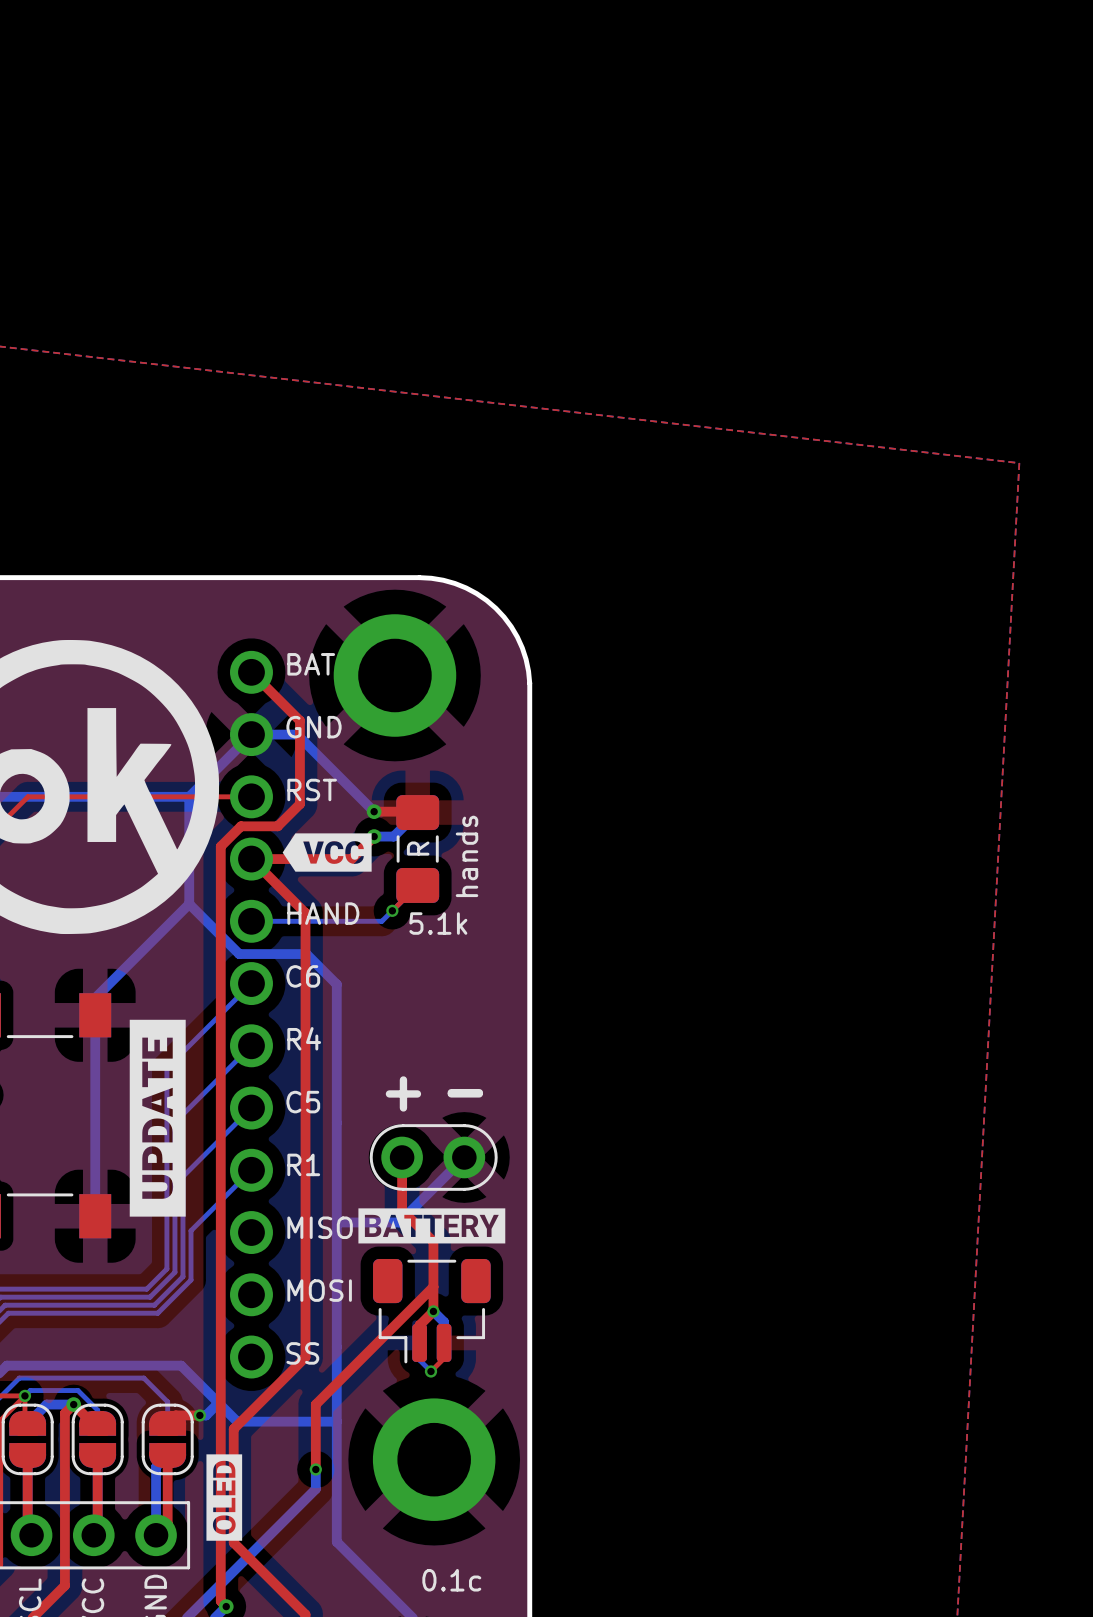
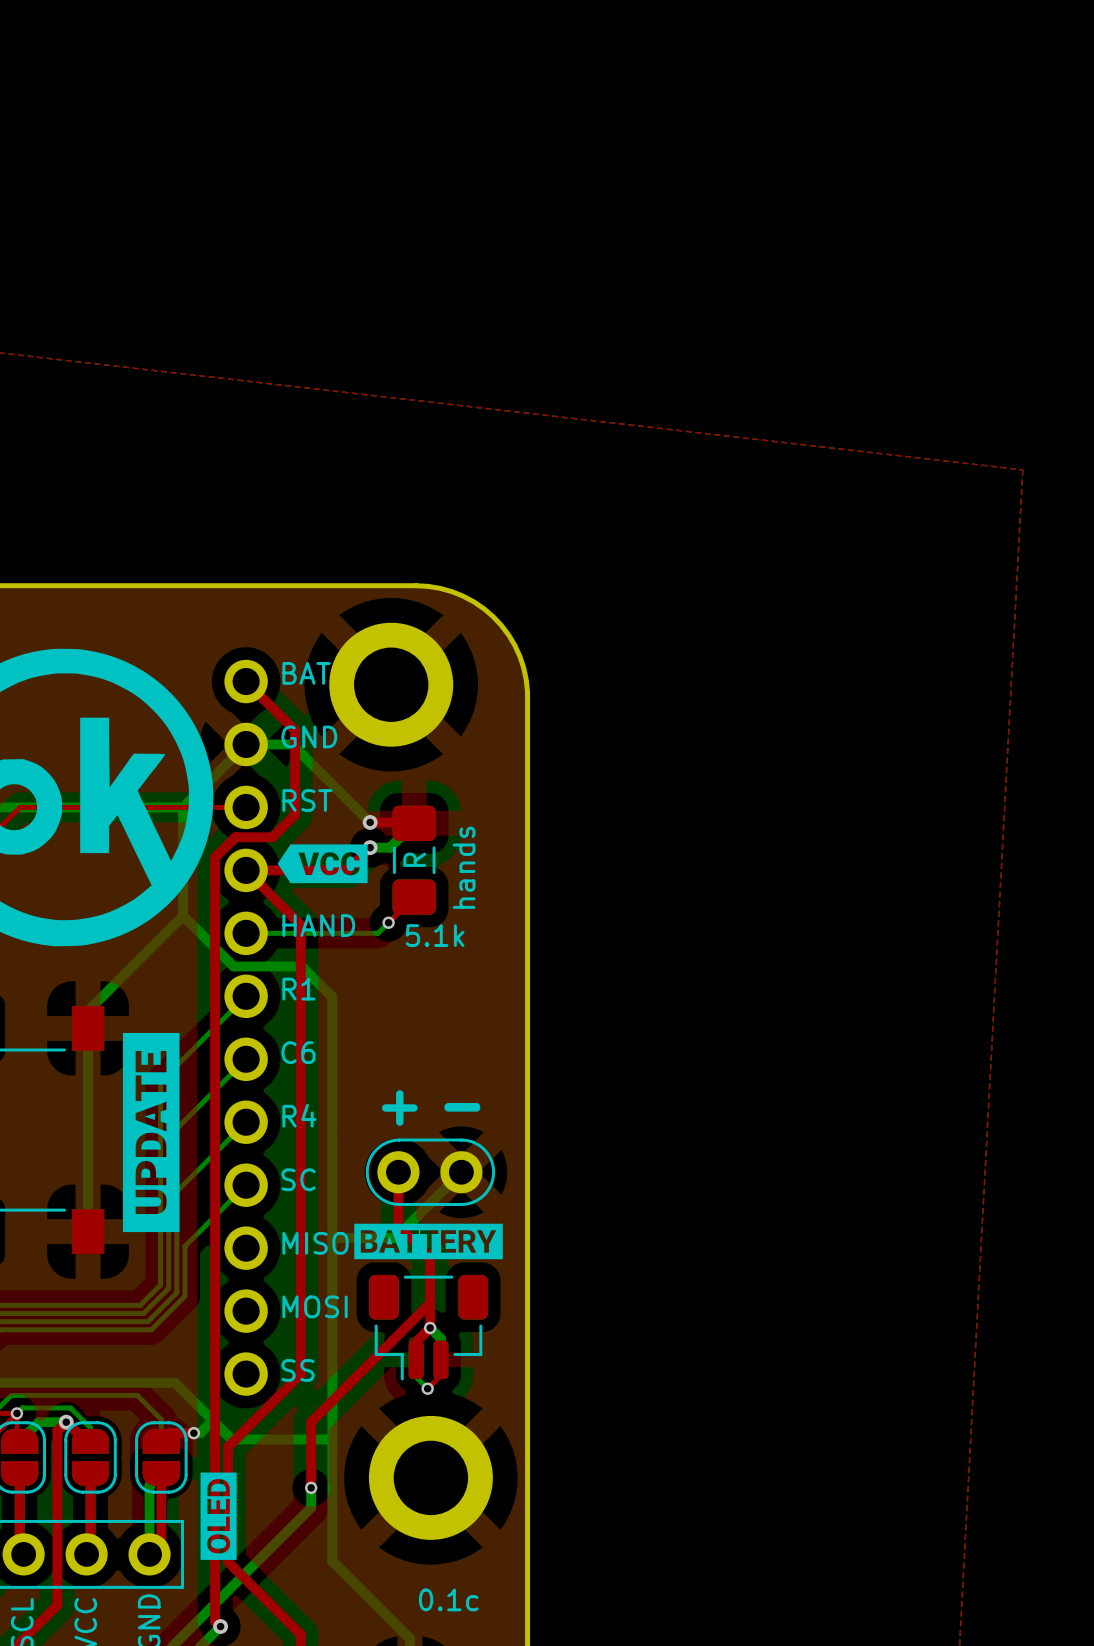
text: C6 (303, 976) -> R1 (298, 989)
text: R4 (304, 1038) -> C6 (298, 1052)
text: C5 (303, 1102) -> R4 (299, 1115)
text: R1 (303, 1164) -> SC (298, 1179)

